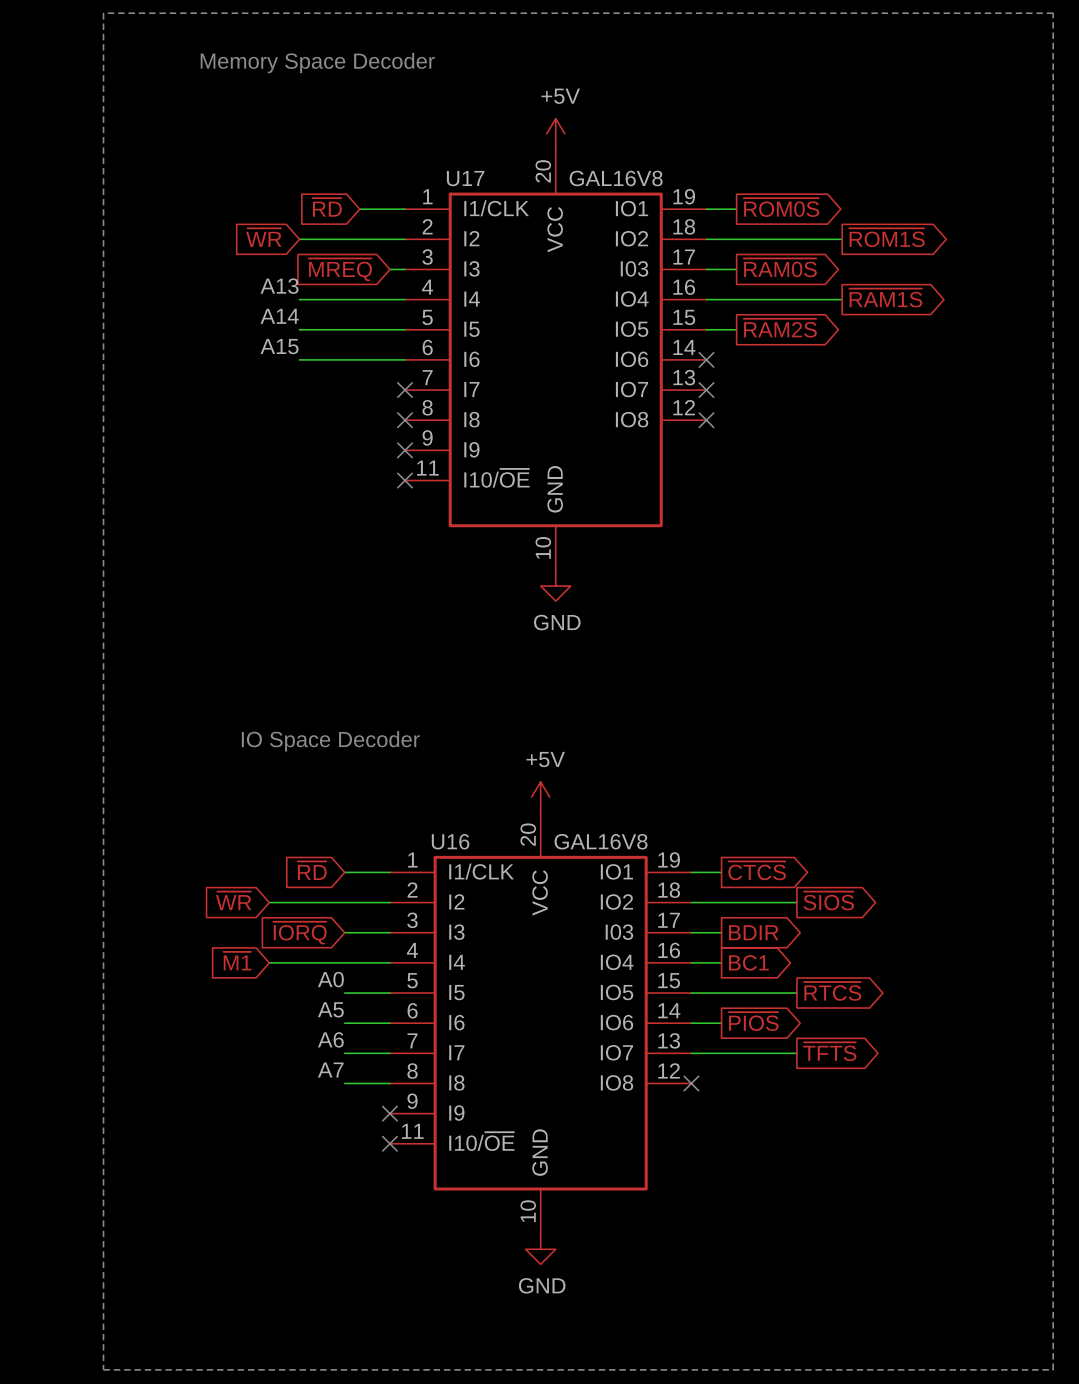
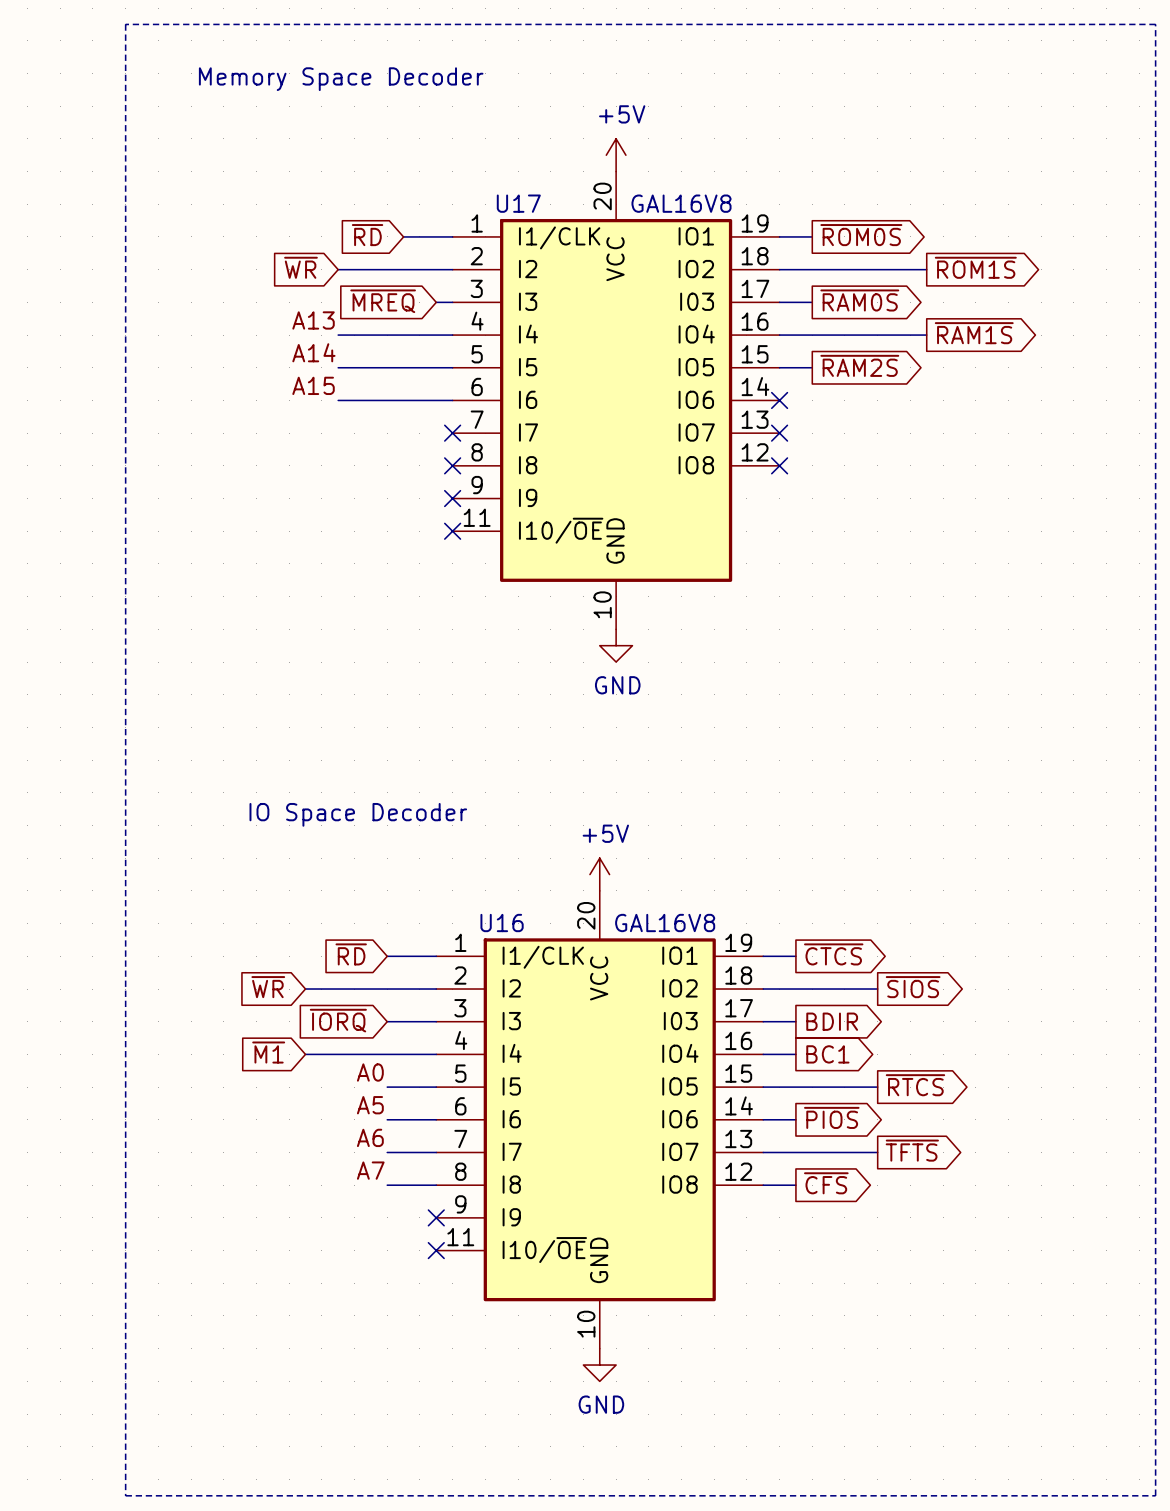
global label: none -> ~{CFS} (826, 1183)
wire: none -> (763, 1185) (795, 1185)
no-connect mark: (691, 1083) -> none

